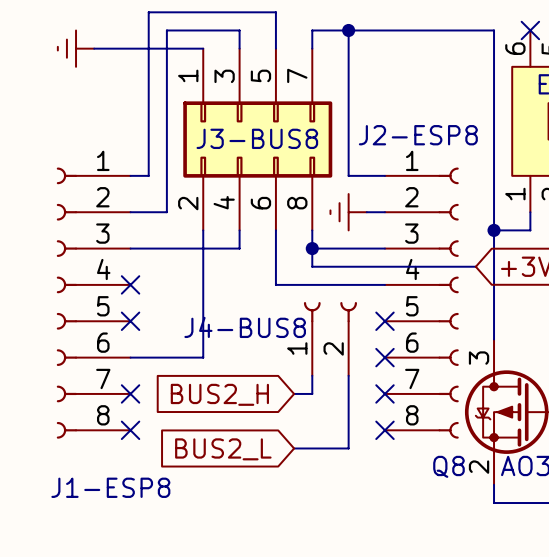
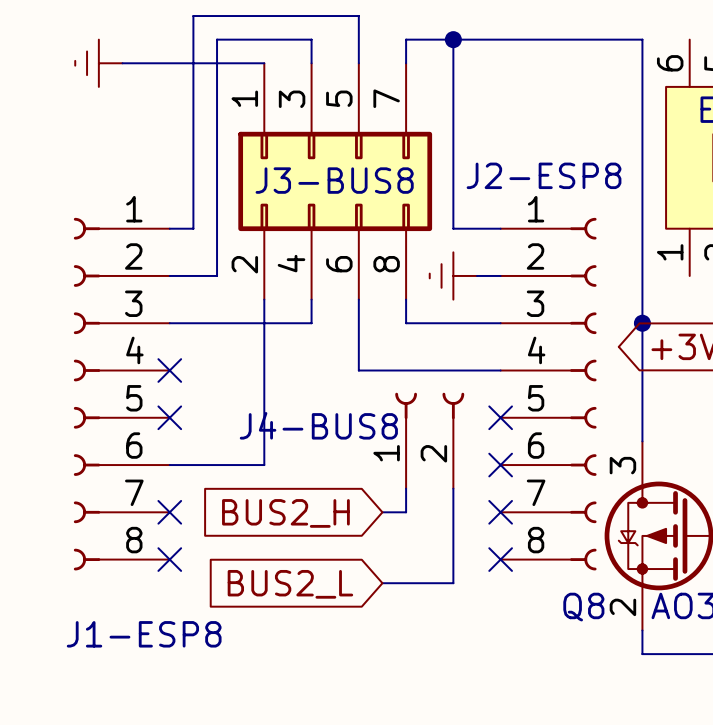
no-connect mark: (530, 30) -> none
wire: (530, 212) (530, 230) (494, 230) -> none
junction position: (494, 230) -> (642, 323)
wire: (312, 248) (312, 266) (475, 266) -> none
junction: (312, 248) -> none

